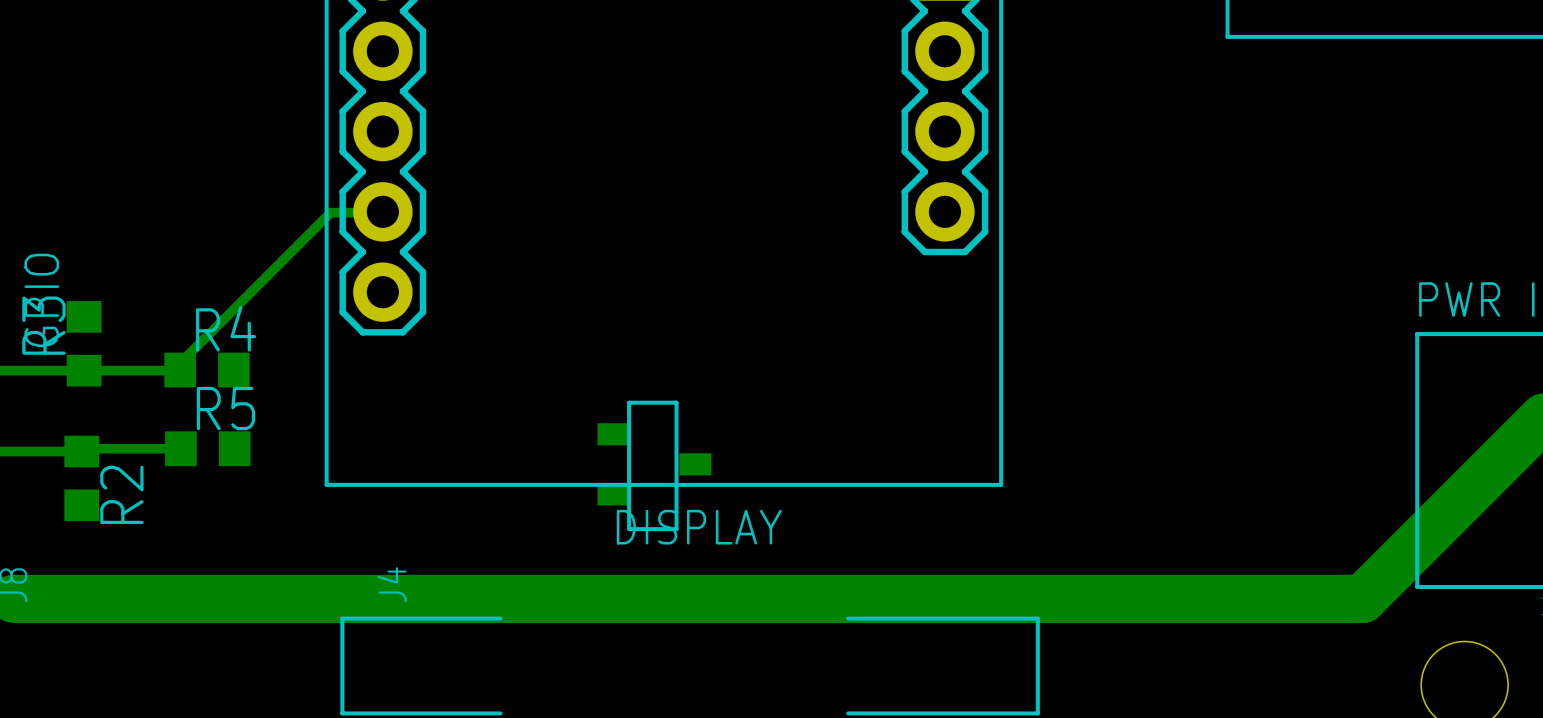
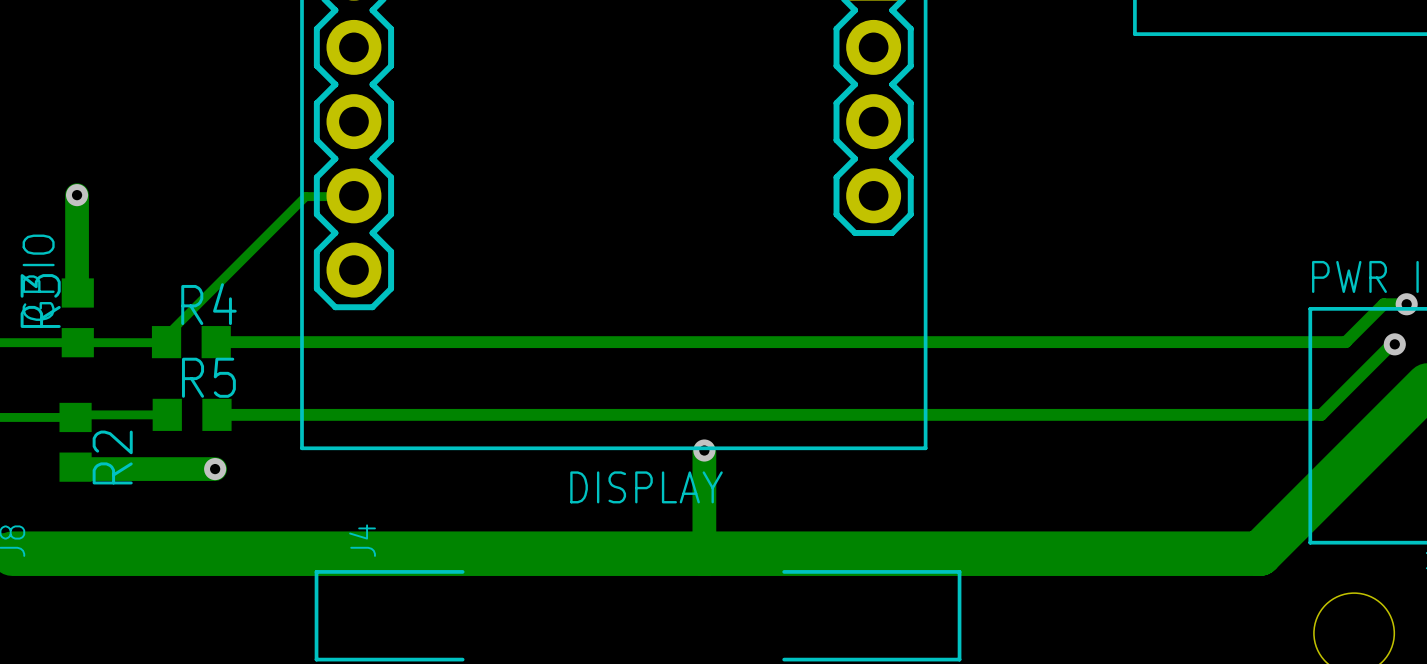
track: none -> (77, 195) (77, 292)
via: none -> (77, 195)
track: none -> (1406, 304) (1383, 304) (1345, 342) (216, 342)
via: none -> (1406, 304)
track: none -> (1394, 344) (1392, 343) (1321, 414) (216, 414)
via: none -> (1394, 344)
part: (654, 465) -> none
track: none -> (704, 450) (704, 553)
via: none -> (704, 450)
track: none -> (75, 467) (77, 469) (215, 469)
via: none -> (215, 469)

